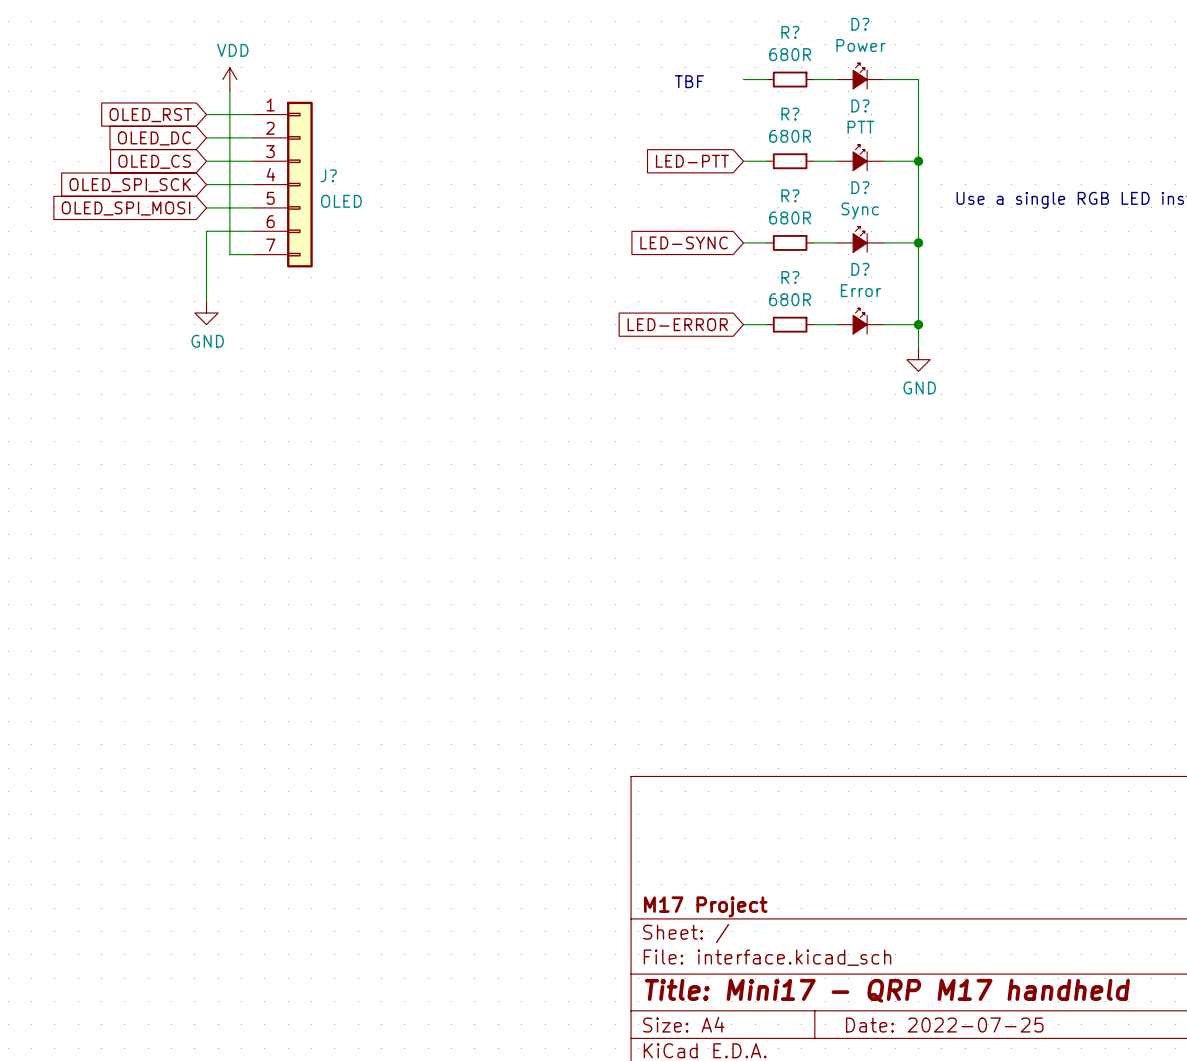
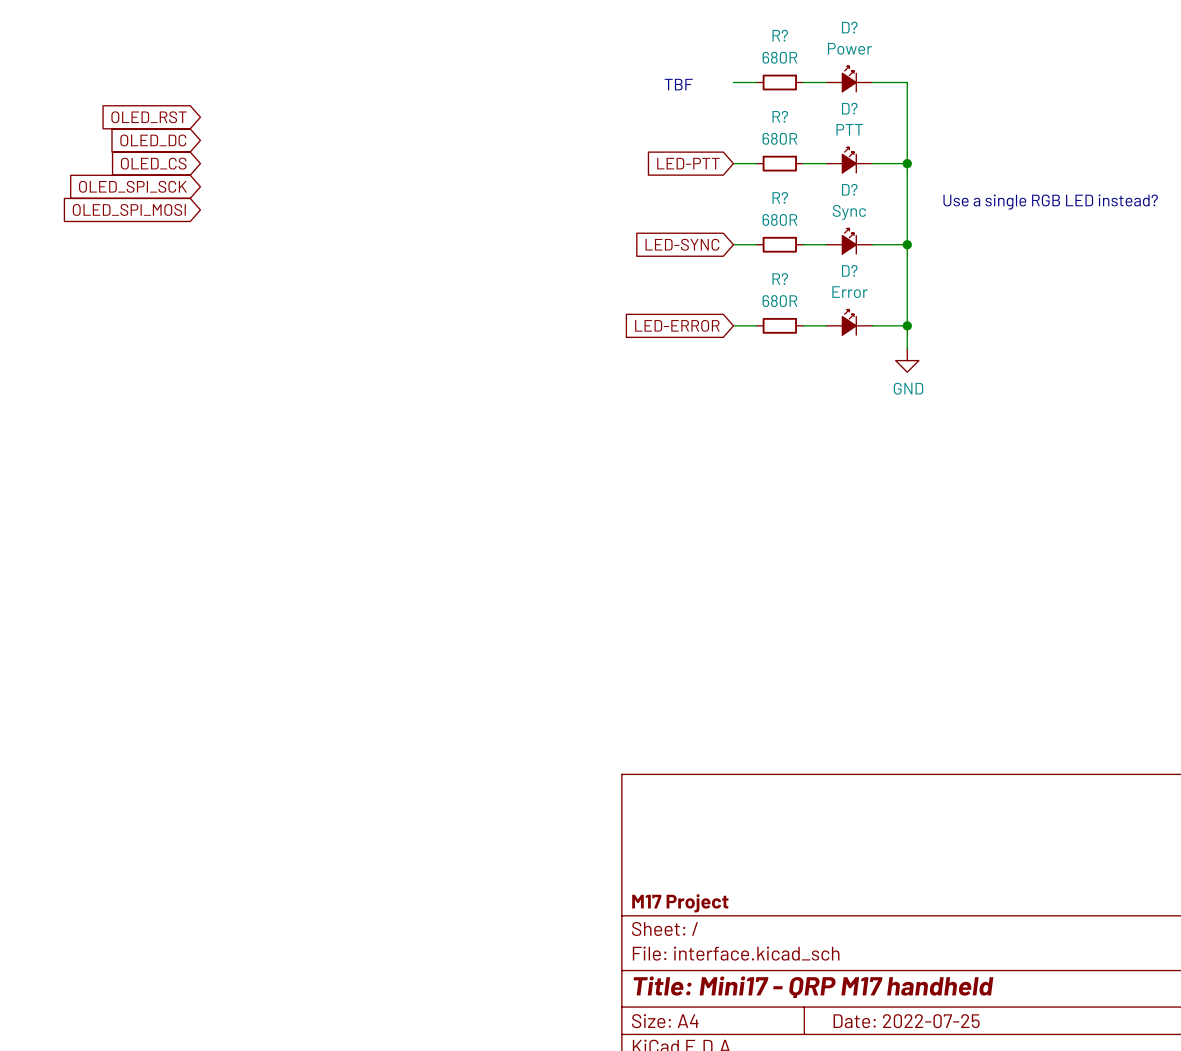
power symbol: VDD (229, 79) -> none
wire: (229, 91) (229, 254) (253, 254) -> none
wire: (206, 114) (253, 114) -> none
wire: (206, 137) (253, 137) -> none
wire: (206, 161) (253, 161) -> none
wire: (206, 184) (253, 184) -> none
J?: OLED (282, 184) -> none
wire: (206, 207) (253, 207) -> none
wire: (253, 231) (206, 231) (206, 301) -> none
power symbol: GND (206, 312) -> none

